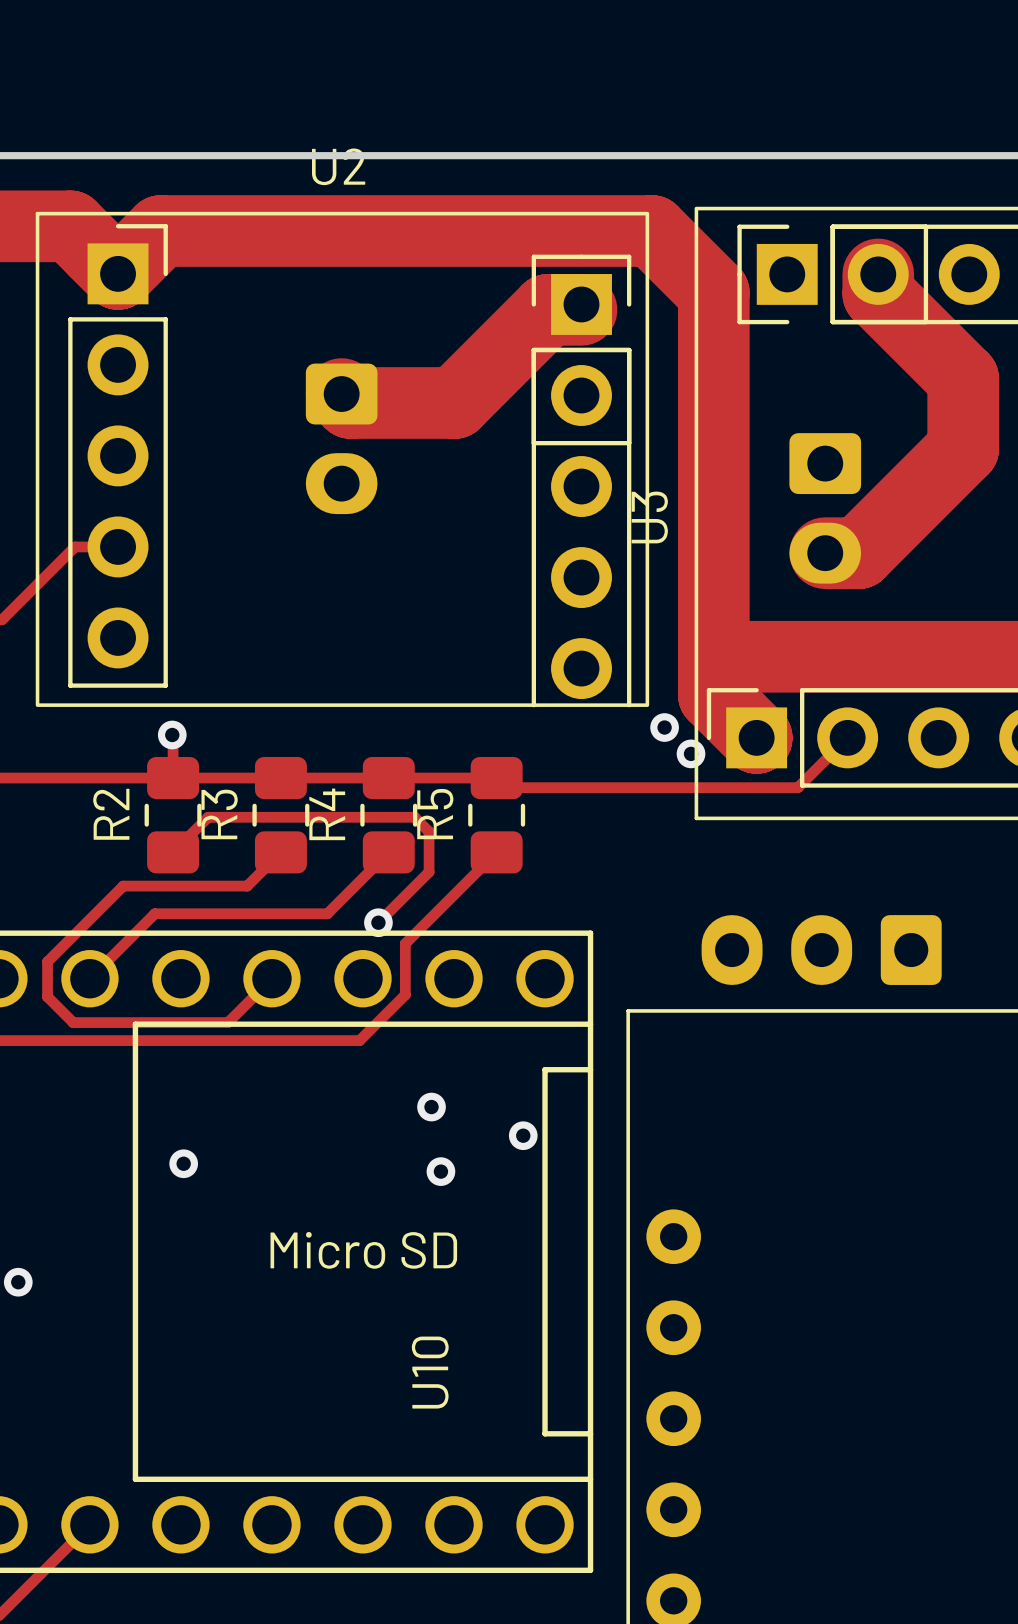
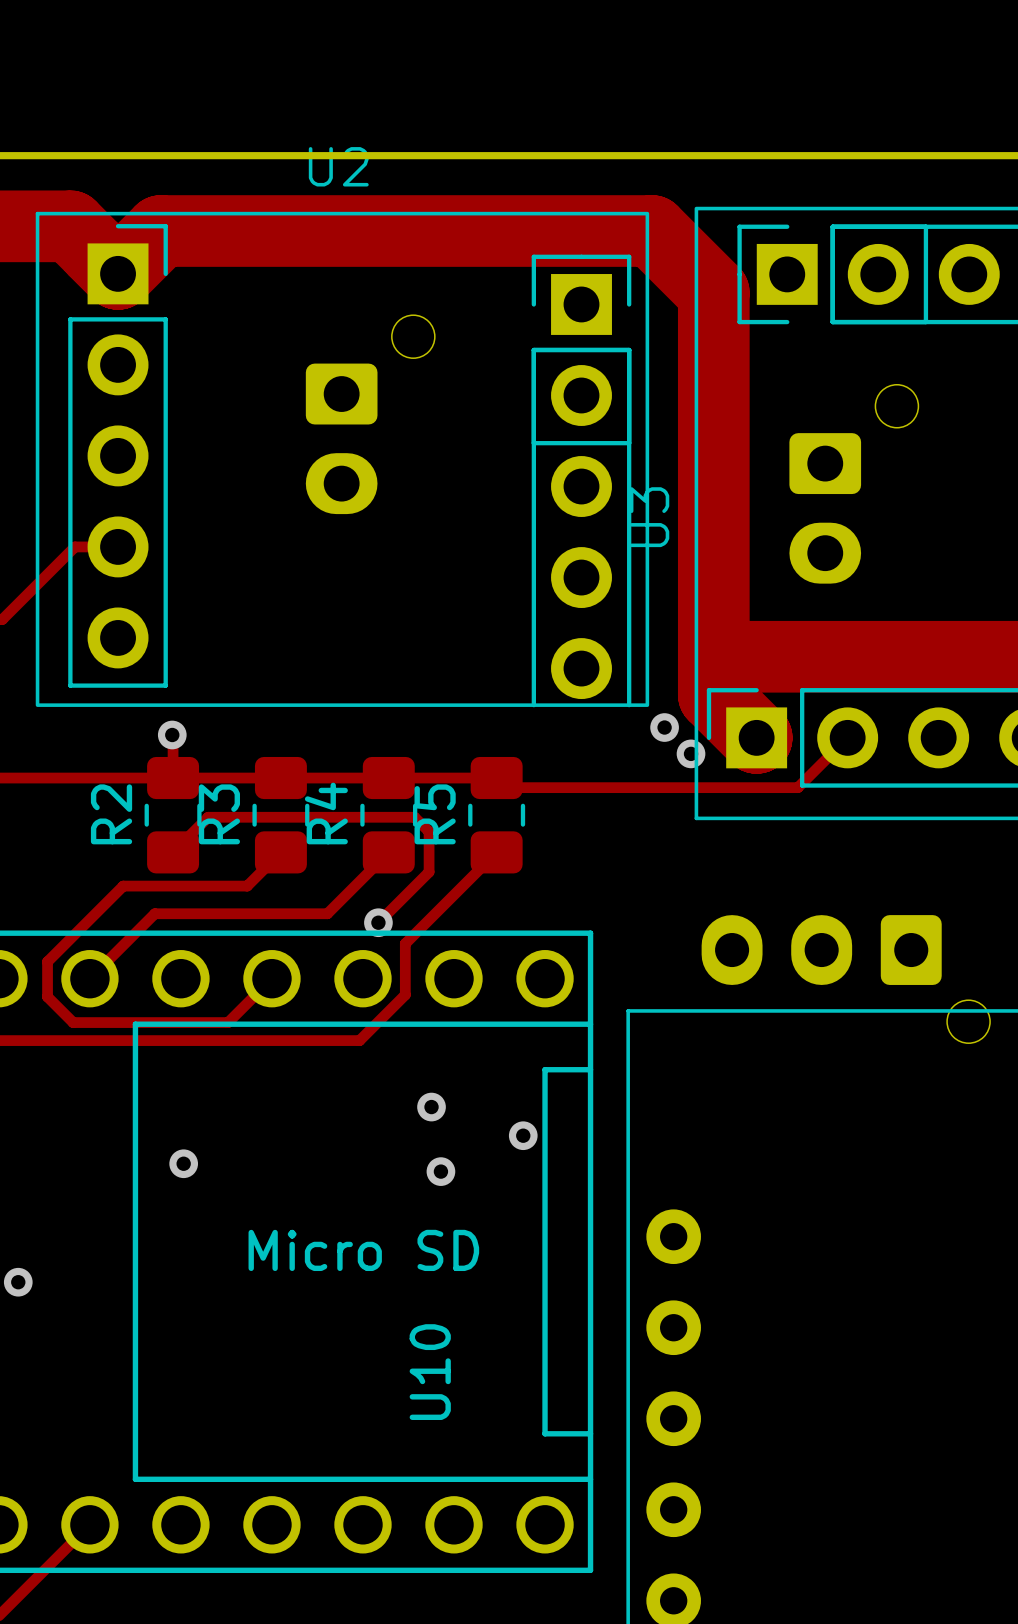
track: (878, 274) (878, 293) (963, 378) (963, 448) (858, 553) (825, 553) -> none
track: (581, 309) (547, 309) (454, 402) (350, 402) (341, 394) -> none
part: none -> (370, 414)
part: (341, 438) -> none
part: none -> (853, 484)
part: (825, 508) -> none
part: none -> (845, 979)

